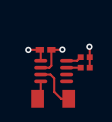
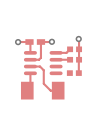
top track: none -> (79, 59) (78, 73)
part: none -> (74, 73)

